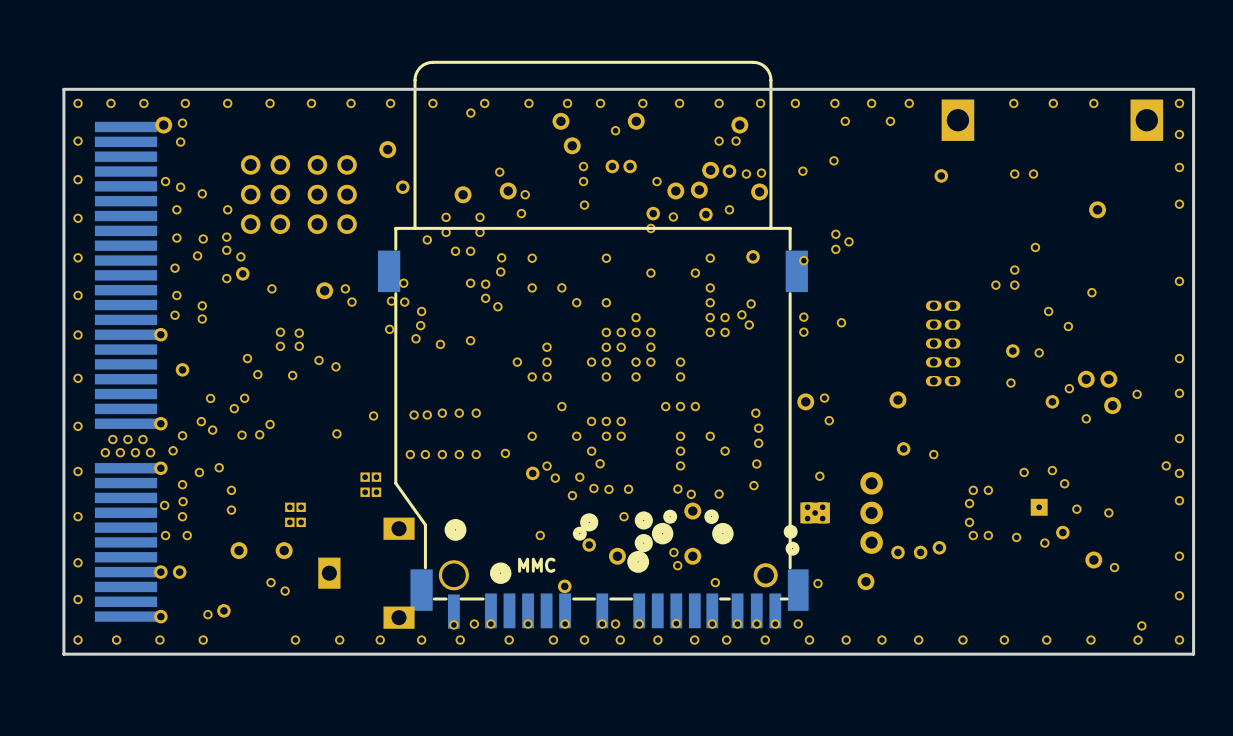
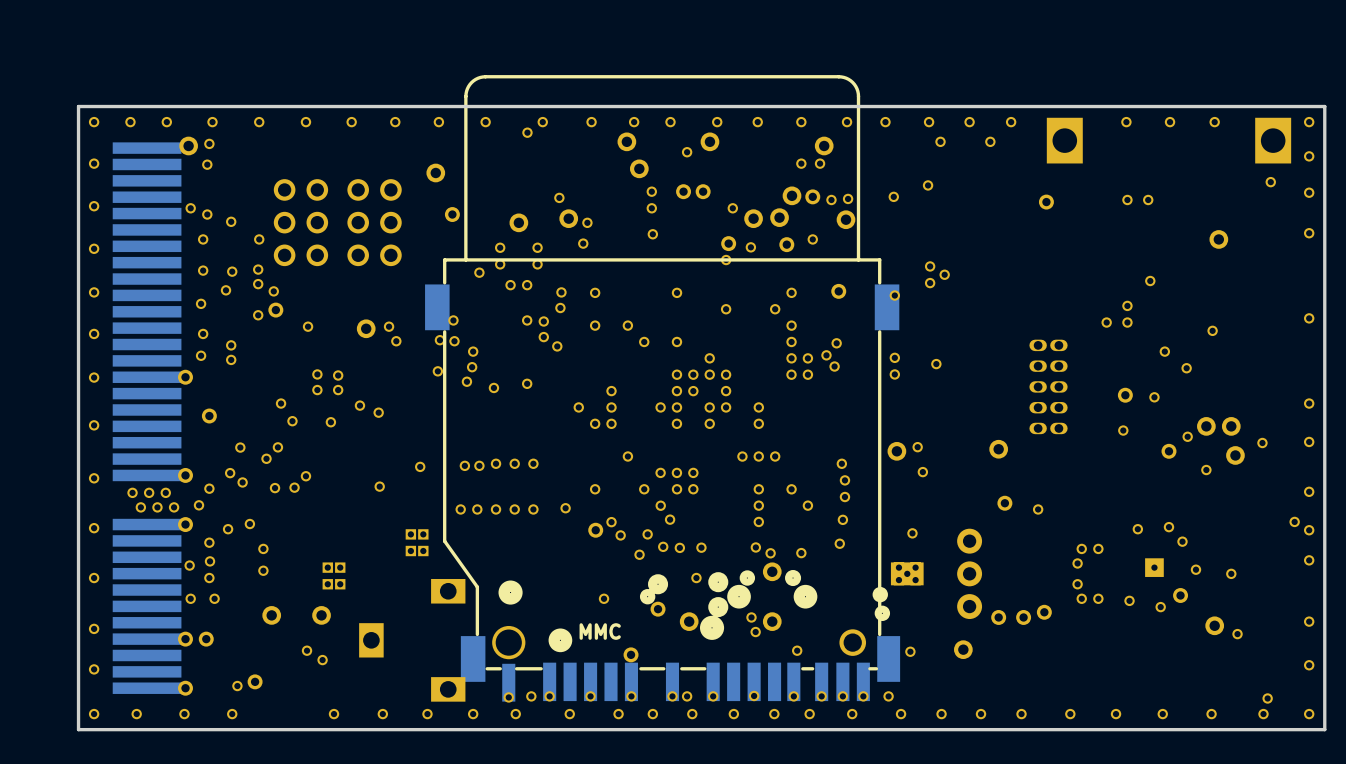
part: none -> (1270, 182)
part: (105, 452) -> none

